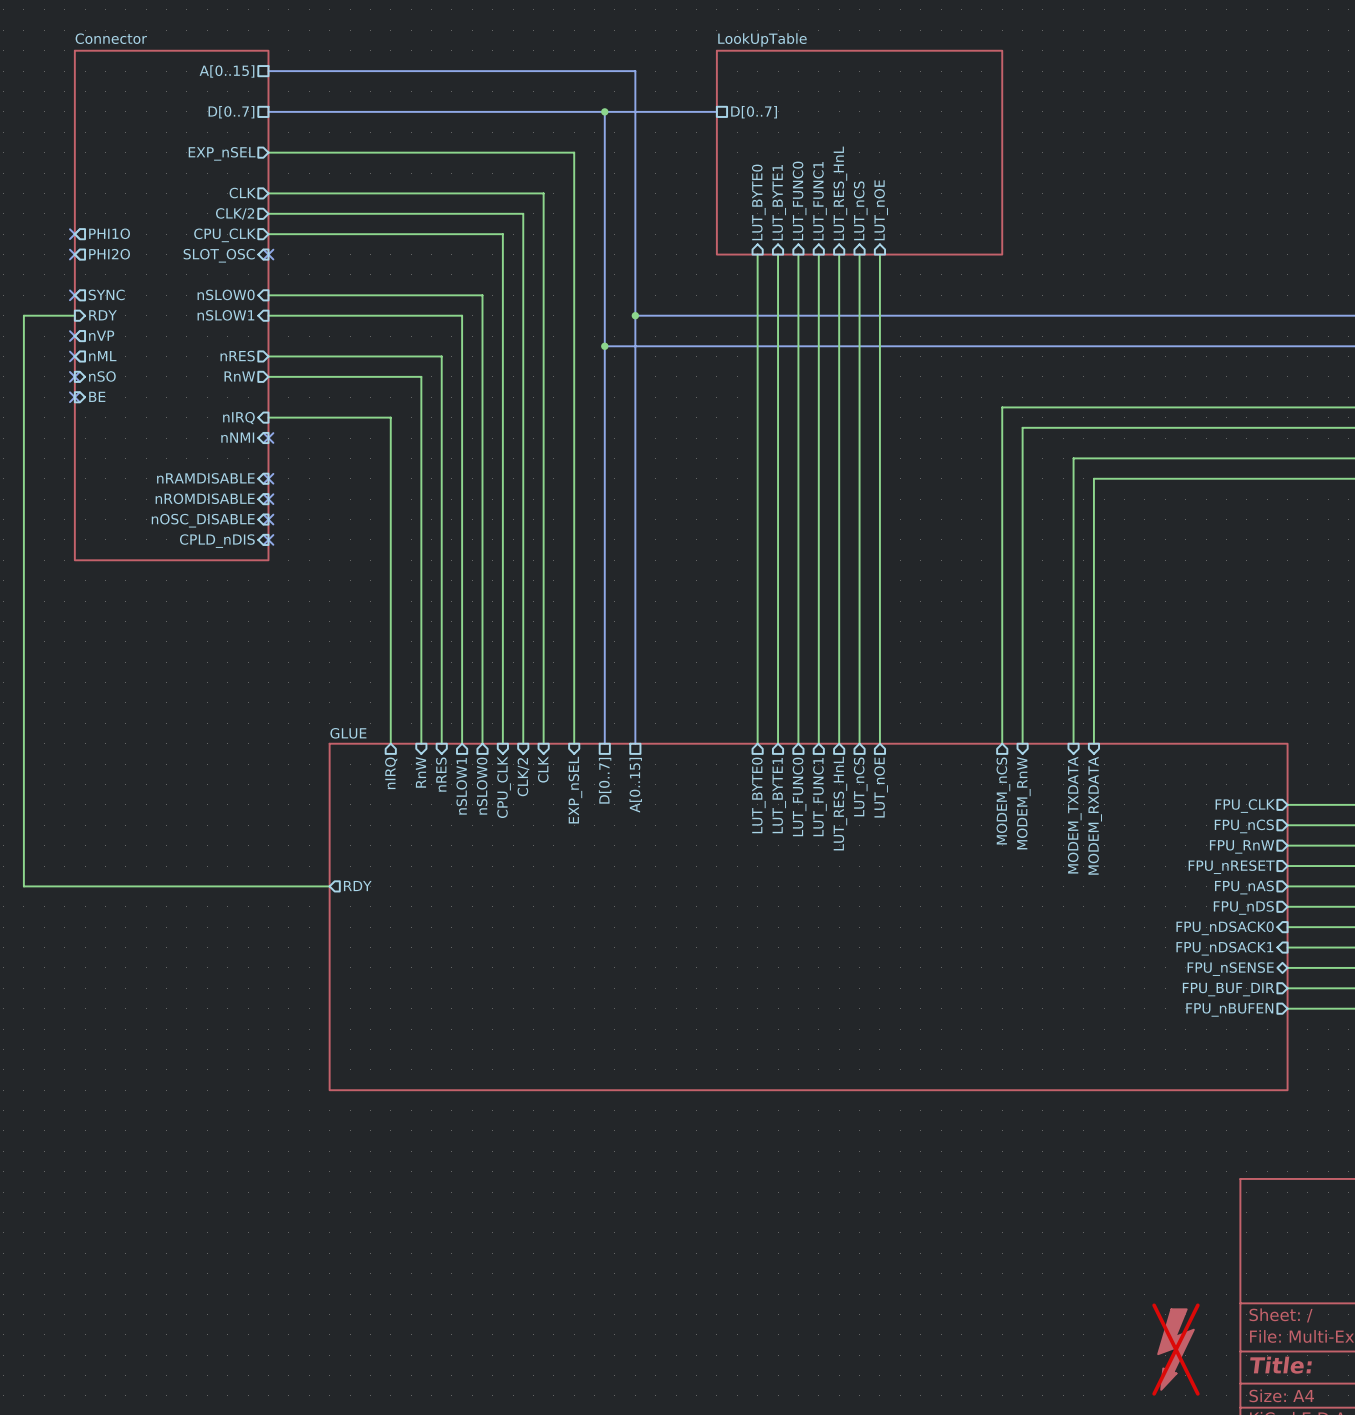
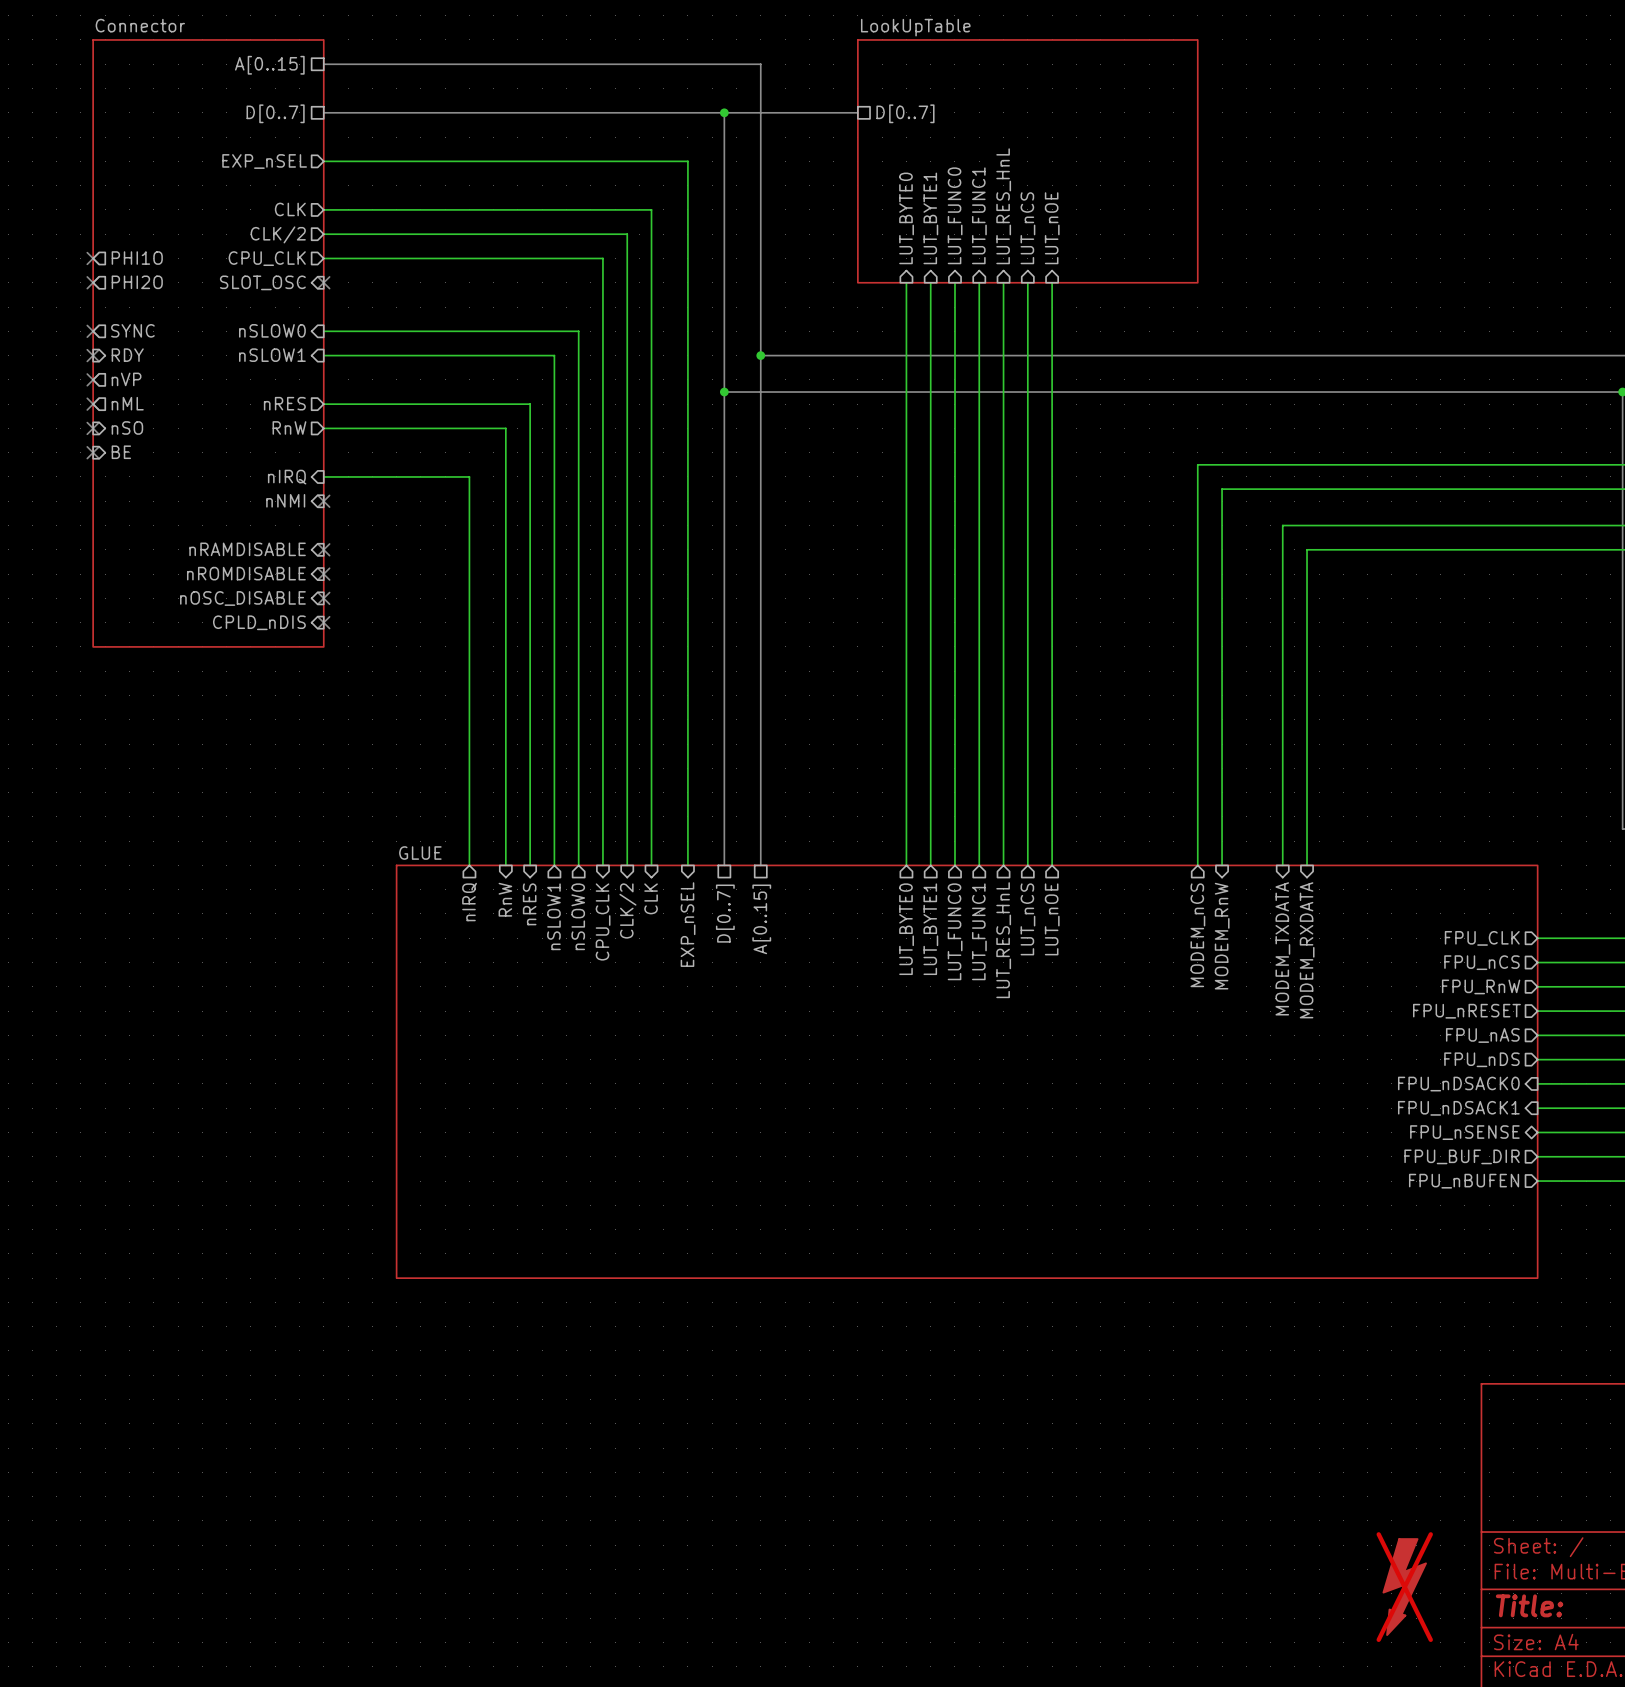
wire: (74, 315) (23, 315) (23, 886) (329, 886) -> none
no-connect mark: none -> (93, 355)
sheet pin: RDY (357, 886) -> none

